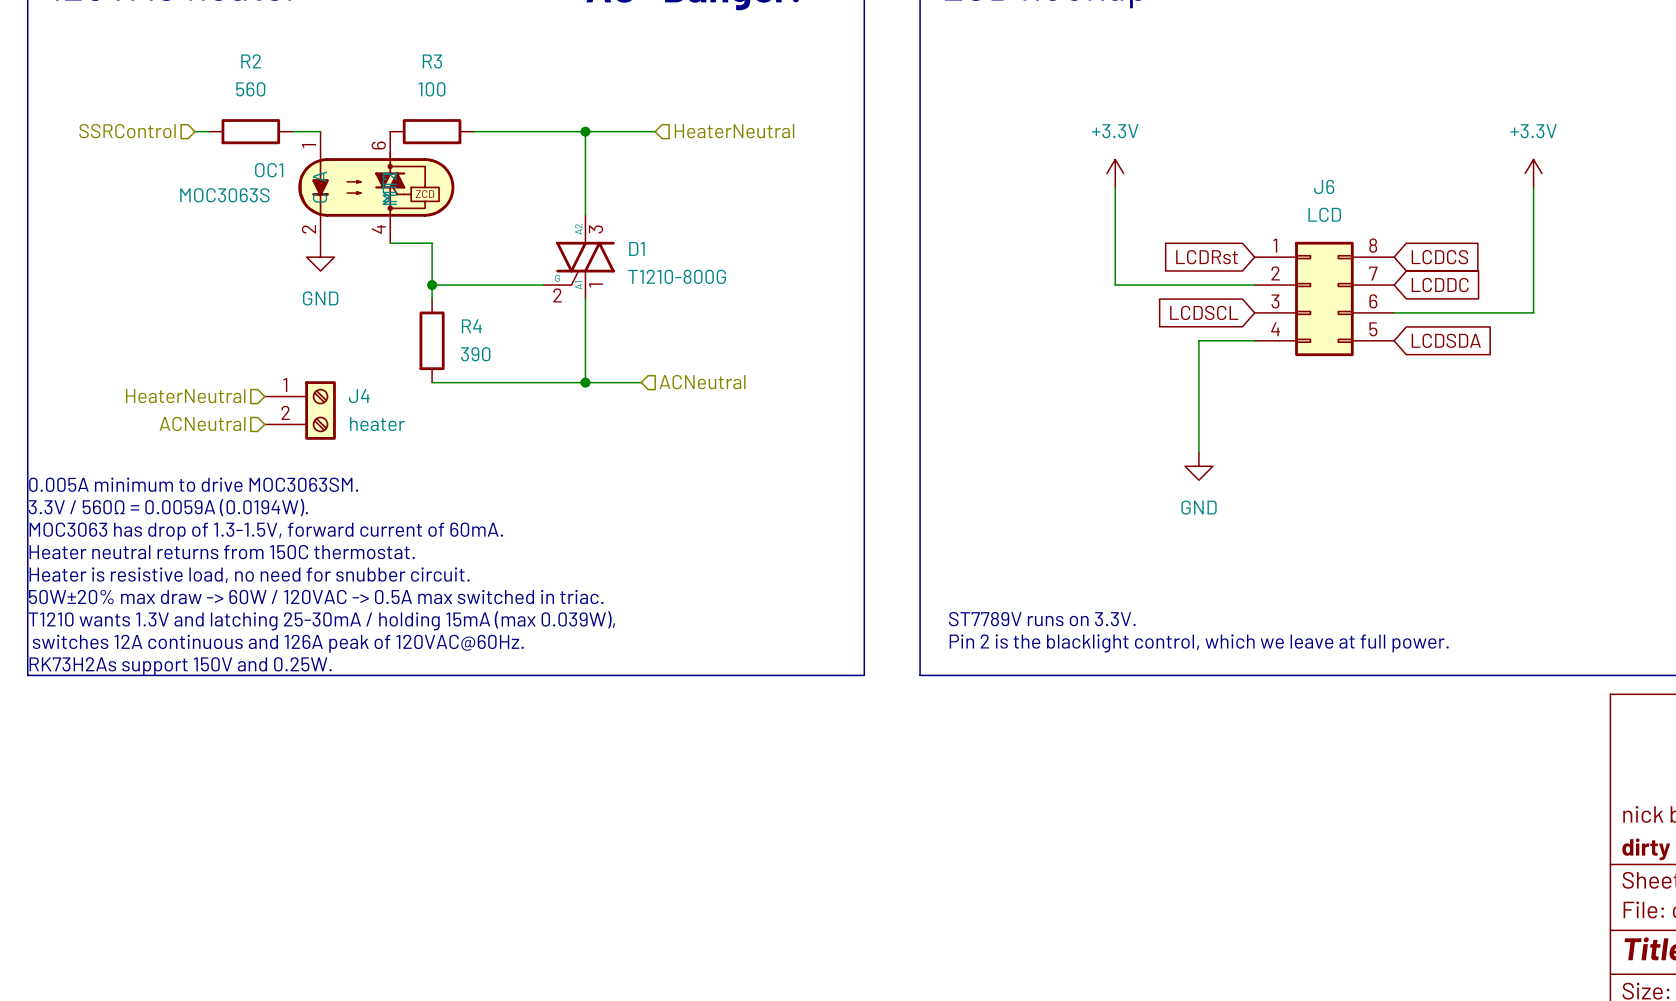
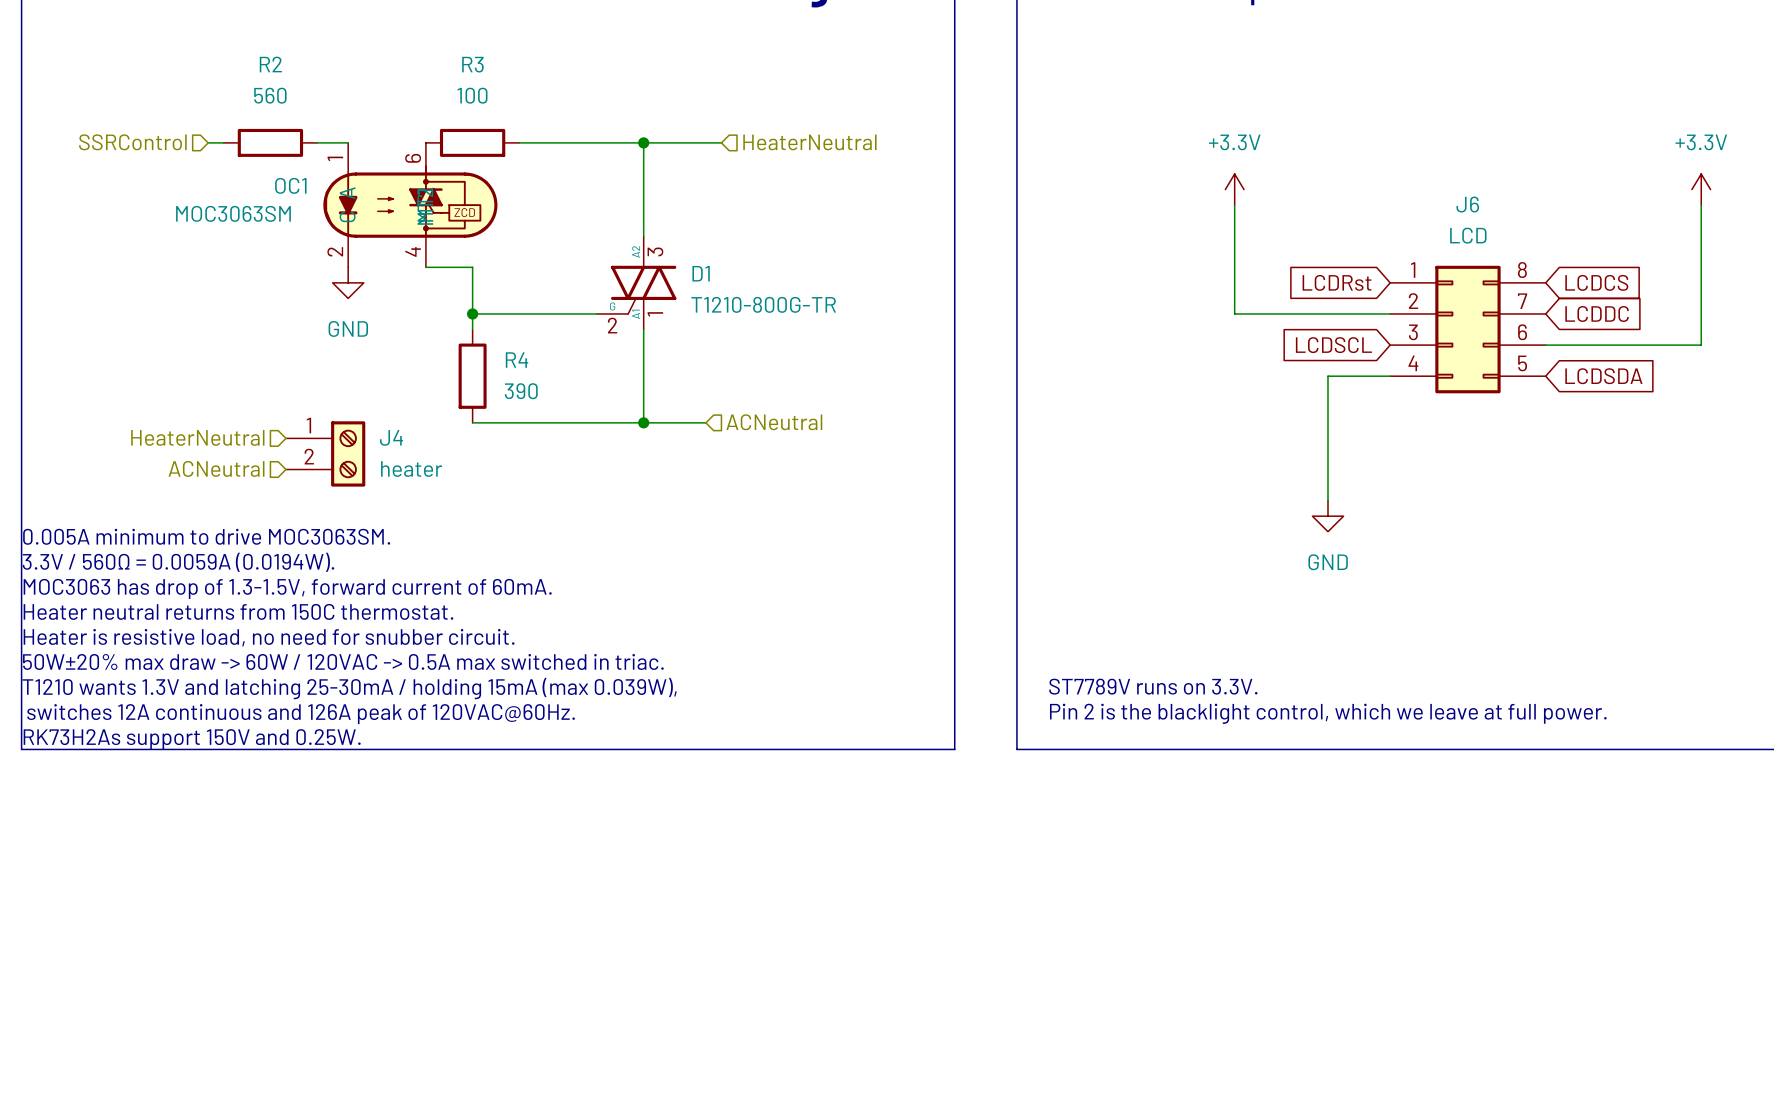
OC1 value: MOC3063S (224, 195) -> MOC3063SM (233, 213)
D1 value: T1210-800G (677, 276) -> T1210-800G-TR (763, 304)

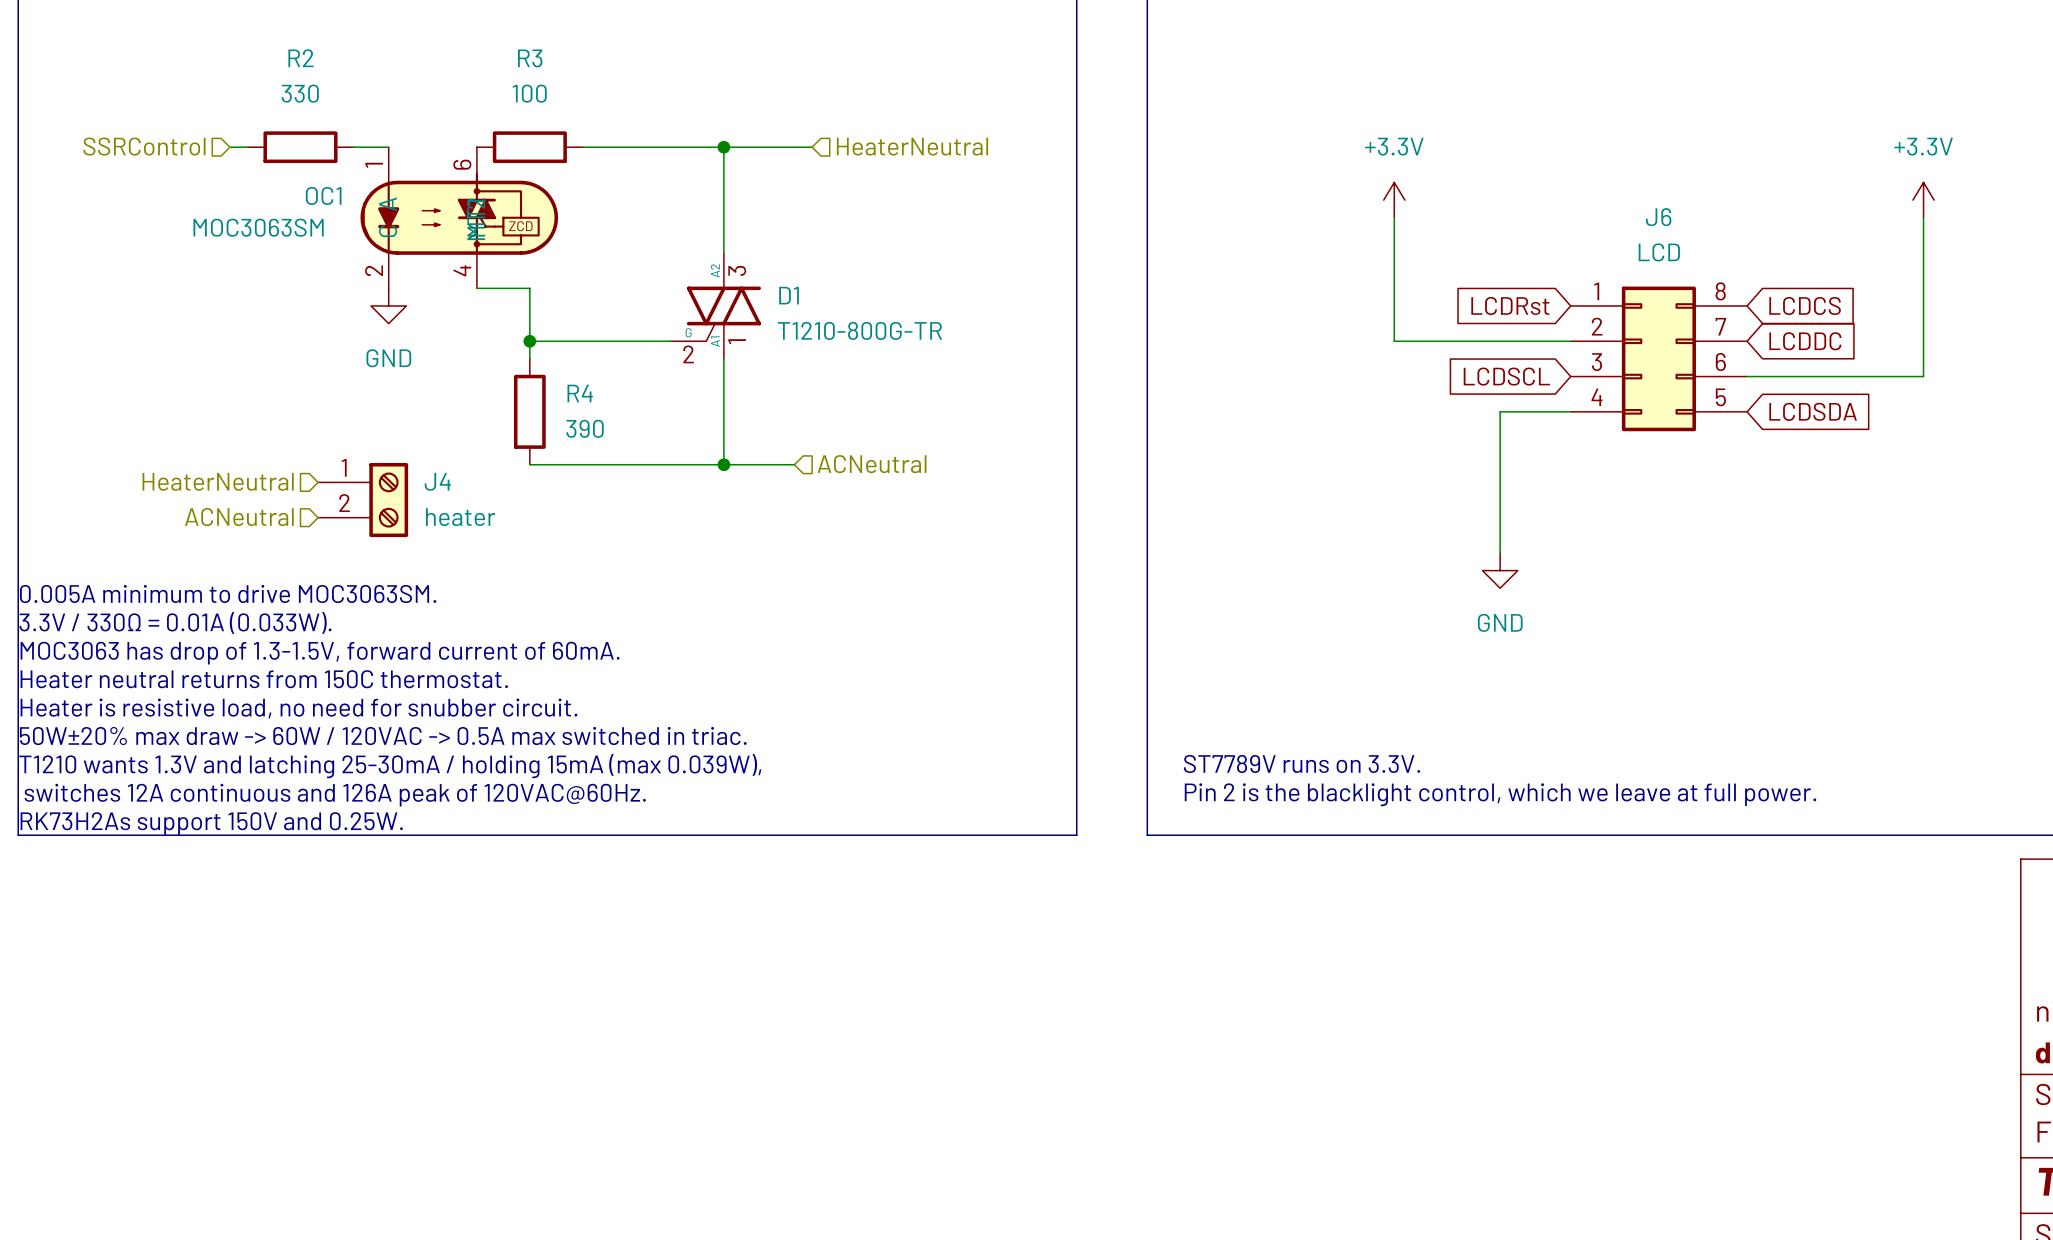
R2 value: 560 (270, 95) -> 330 (300, 93)
text: 3.3V / 560Ω = 0.0059A (0.0194W). (178, 562) -> 3.3V / 330Ω = 0.01A (0.033W). (175, 622)

